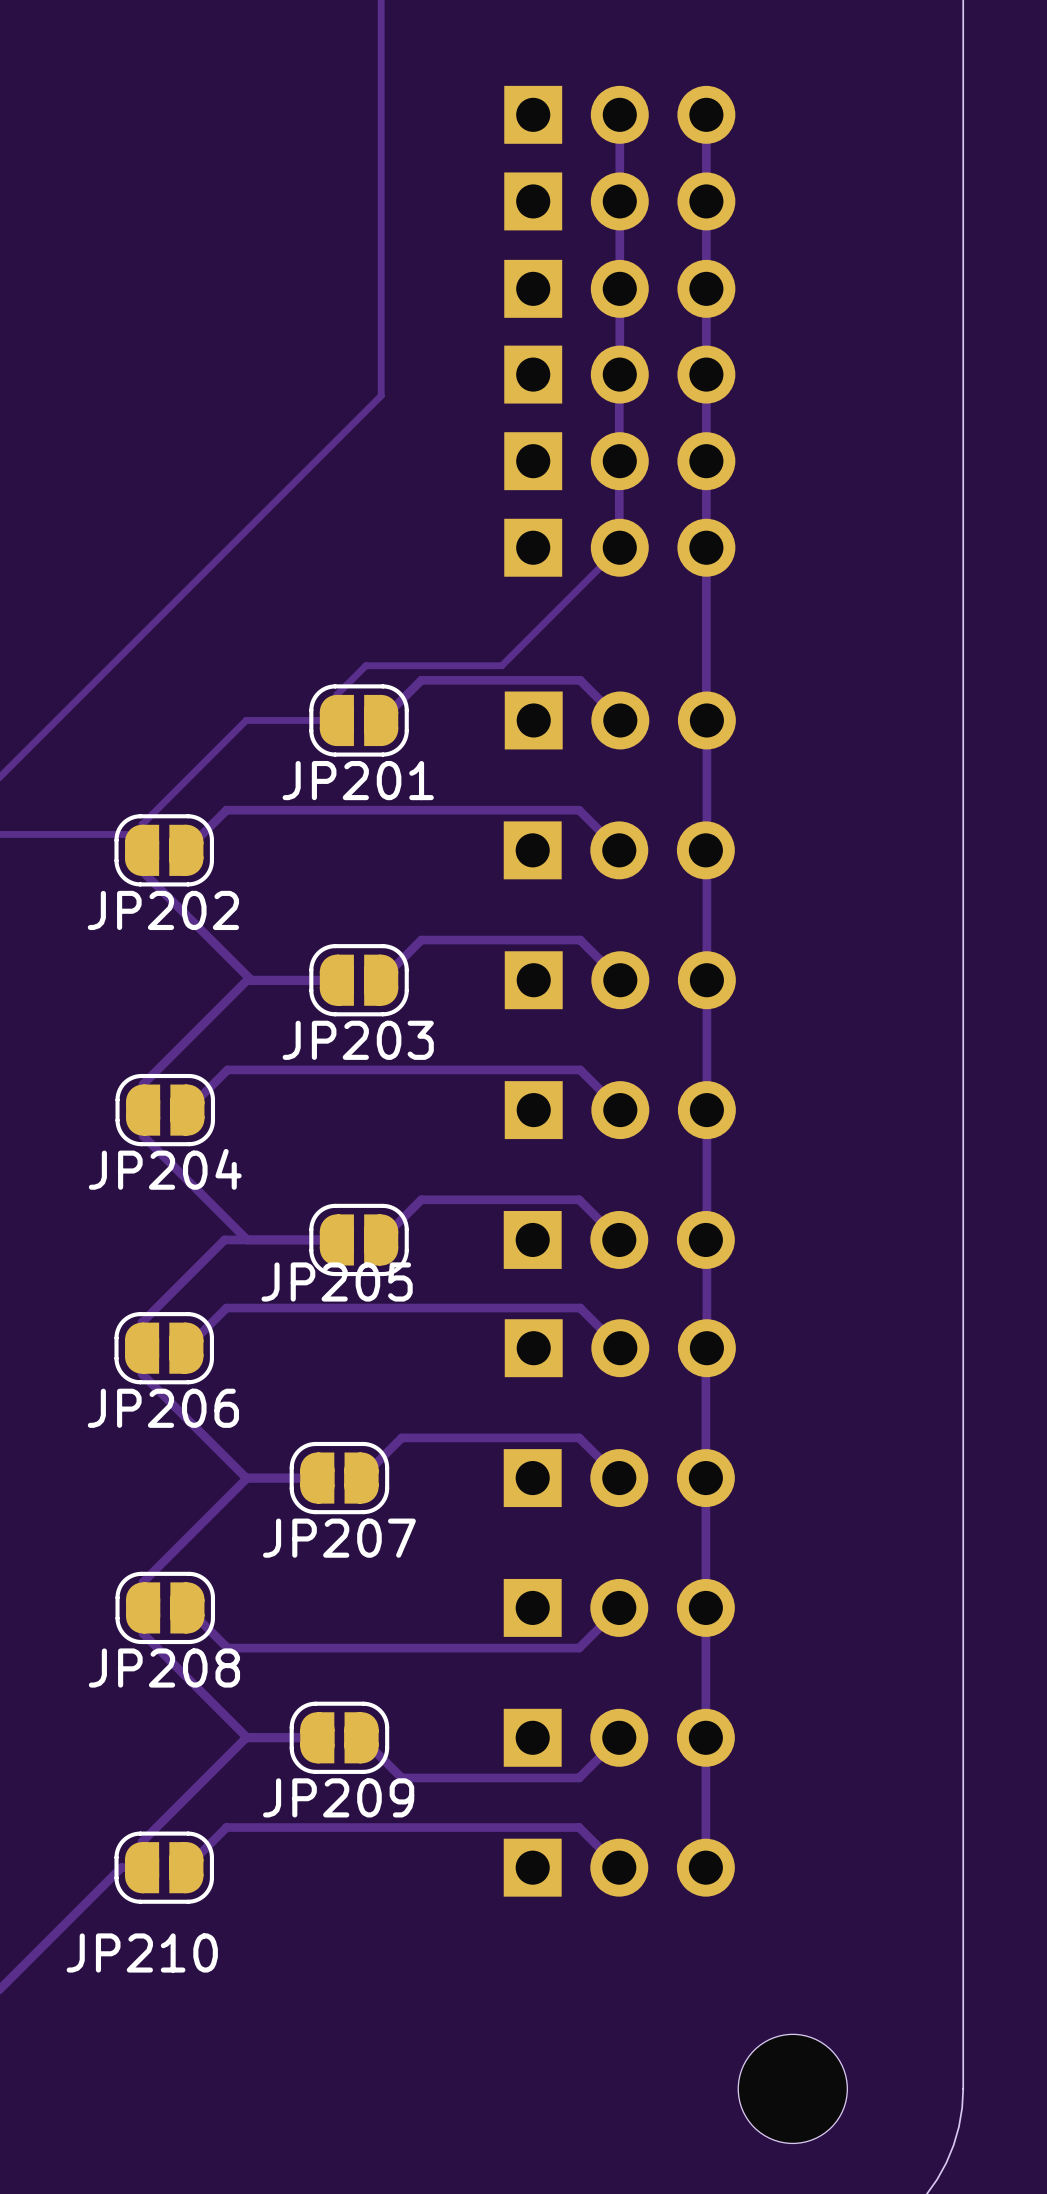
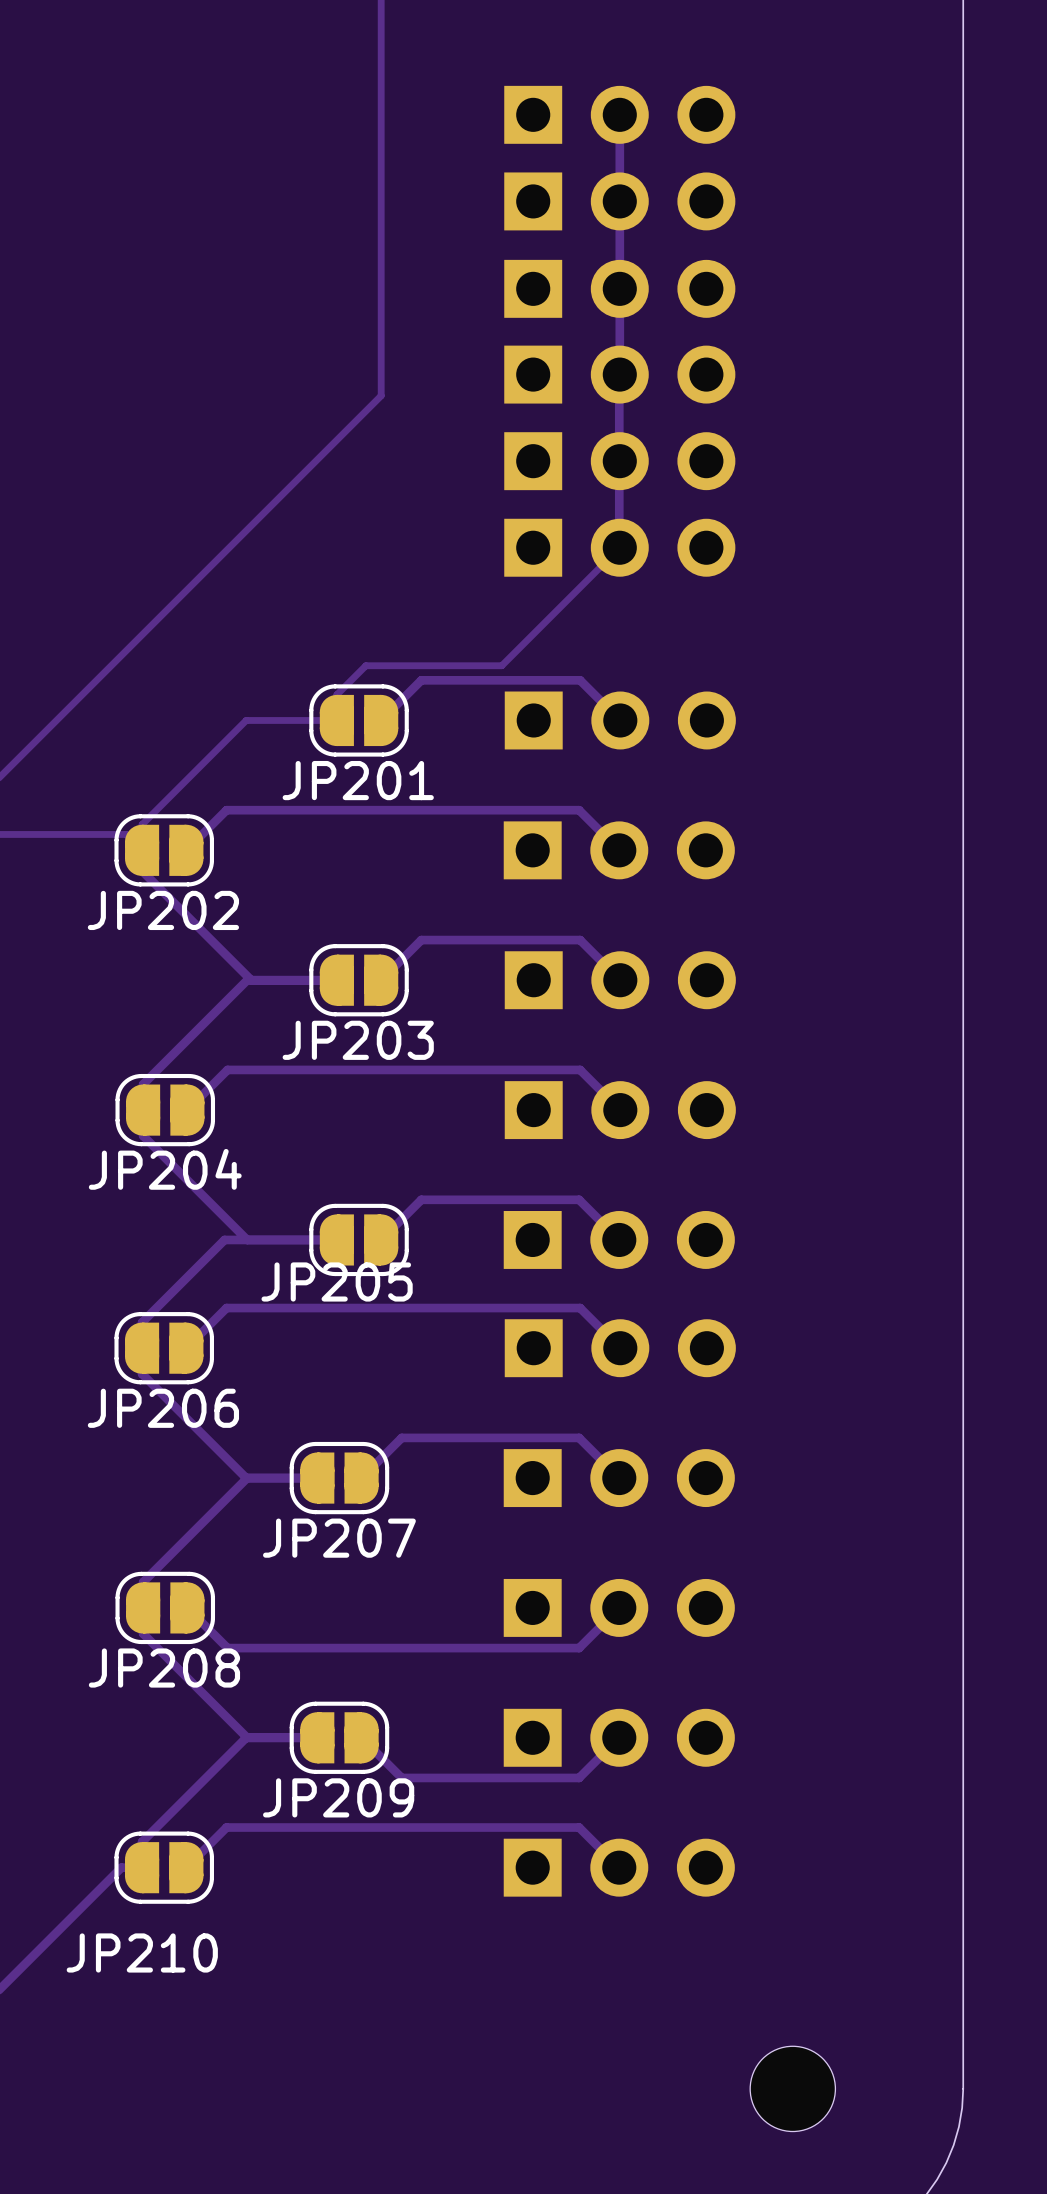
track: (706, 114) (706, 719) -> none
track: (706, 720) (706, 849) -> none
track: (706, 873) (706, 1238) -> none
track: (706, 1262) (706, 1348) -> none
track: (705, 1369) (705, 1867) -> none
part footprint: [738, 2034, 848, 2144] -> [750, 2046, 836, 2132]

